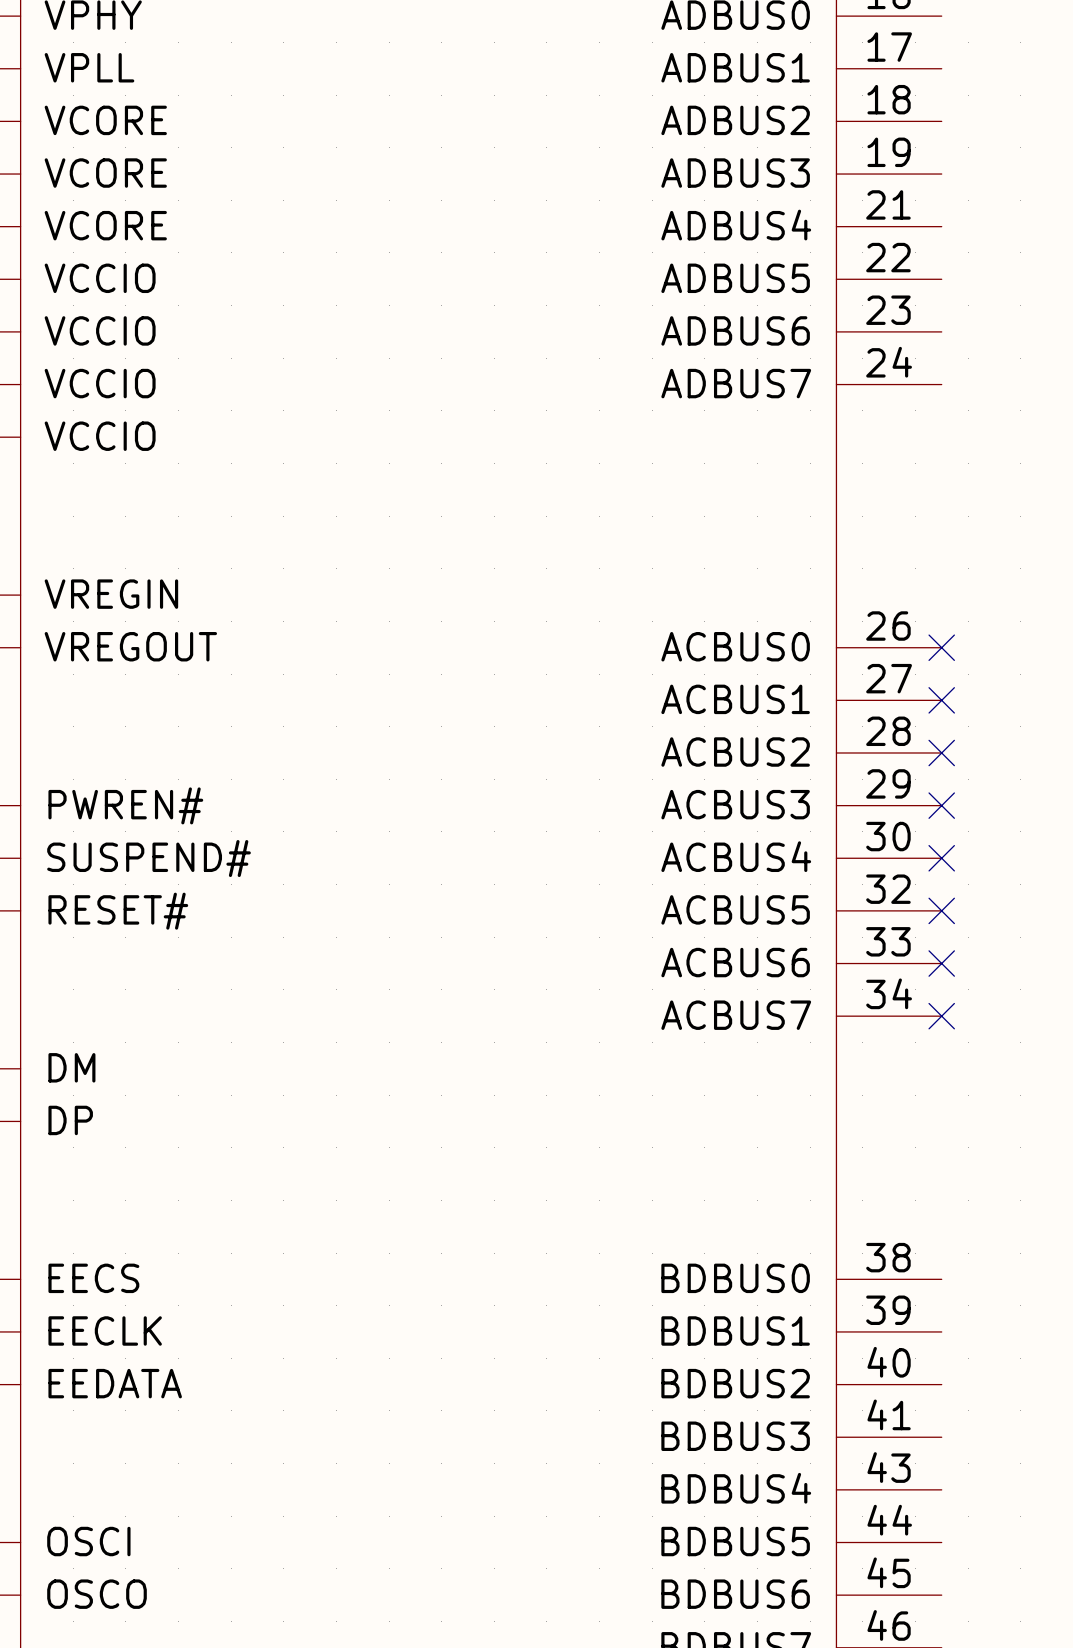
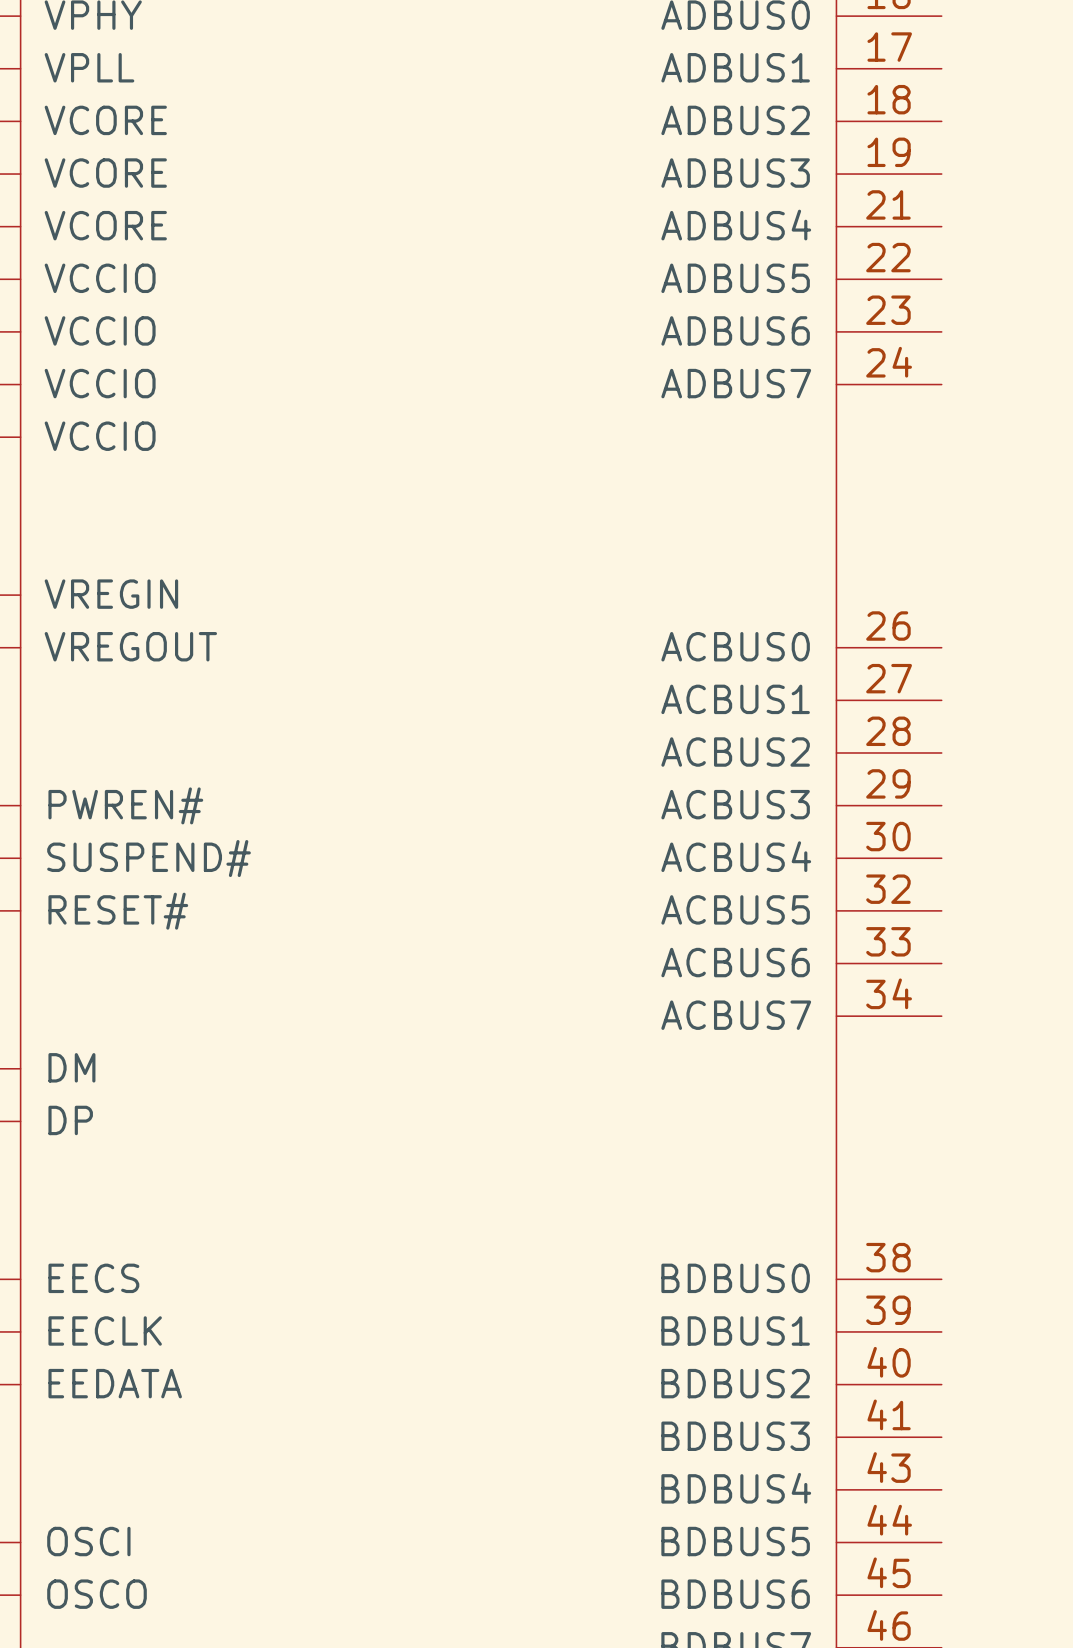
no-connect mark: (941, 647) -> none
no-connect mark: (941, 700) -> none
no-connect mark: (941, 752) -> none
no-connect mark: (941, 805) -> none
no-connect mark: (941, 858) -> none
no-connect mark: (941, 910) -> none
no-connect mark: (941, 963) -> none
no-connect mark: (941, 1016) -> none

